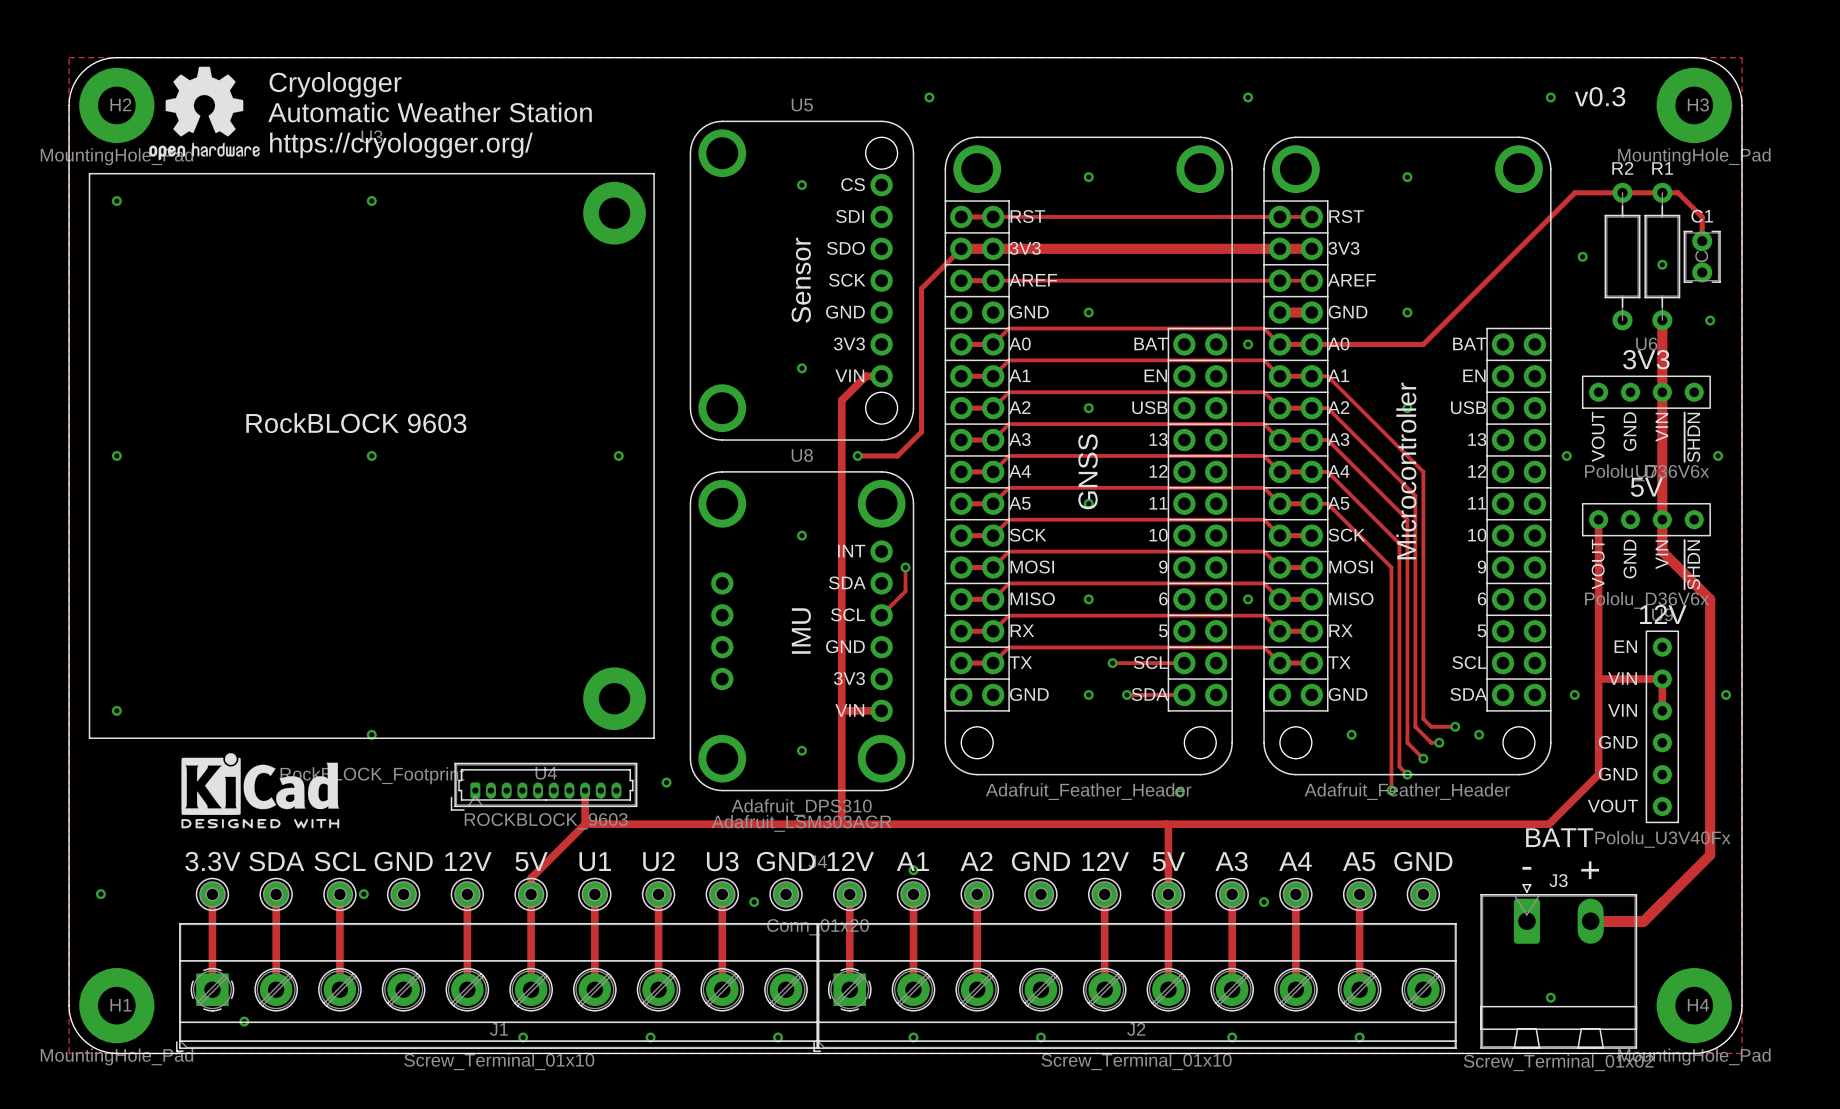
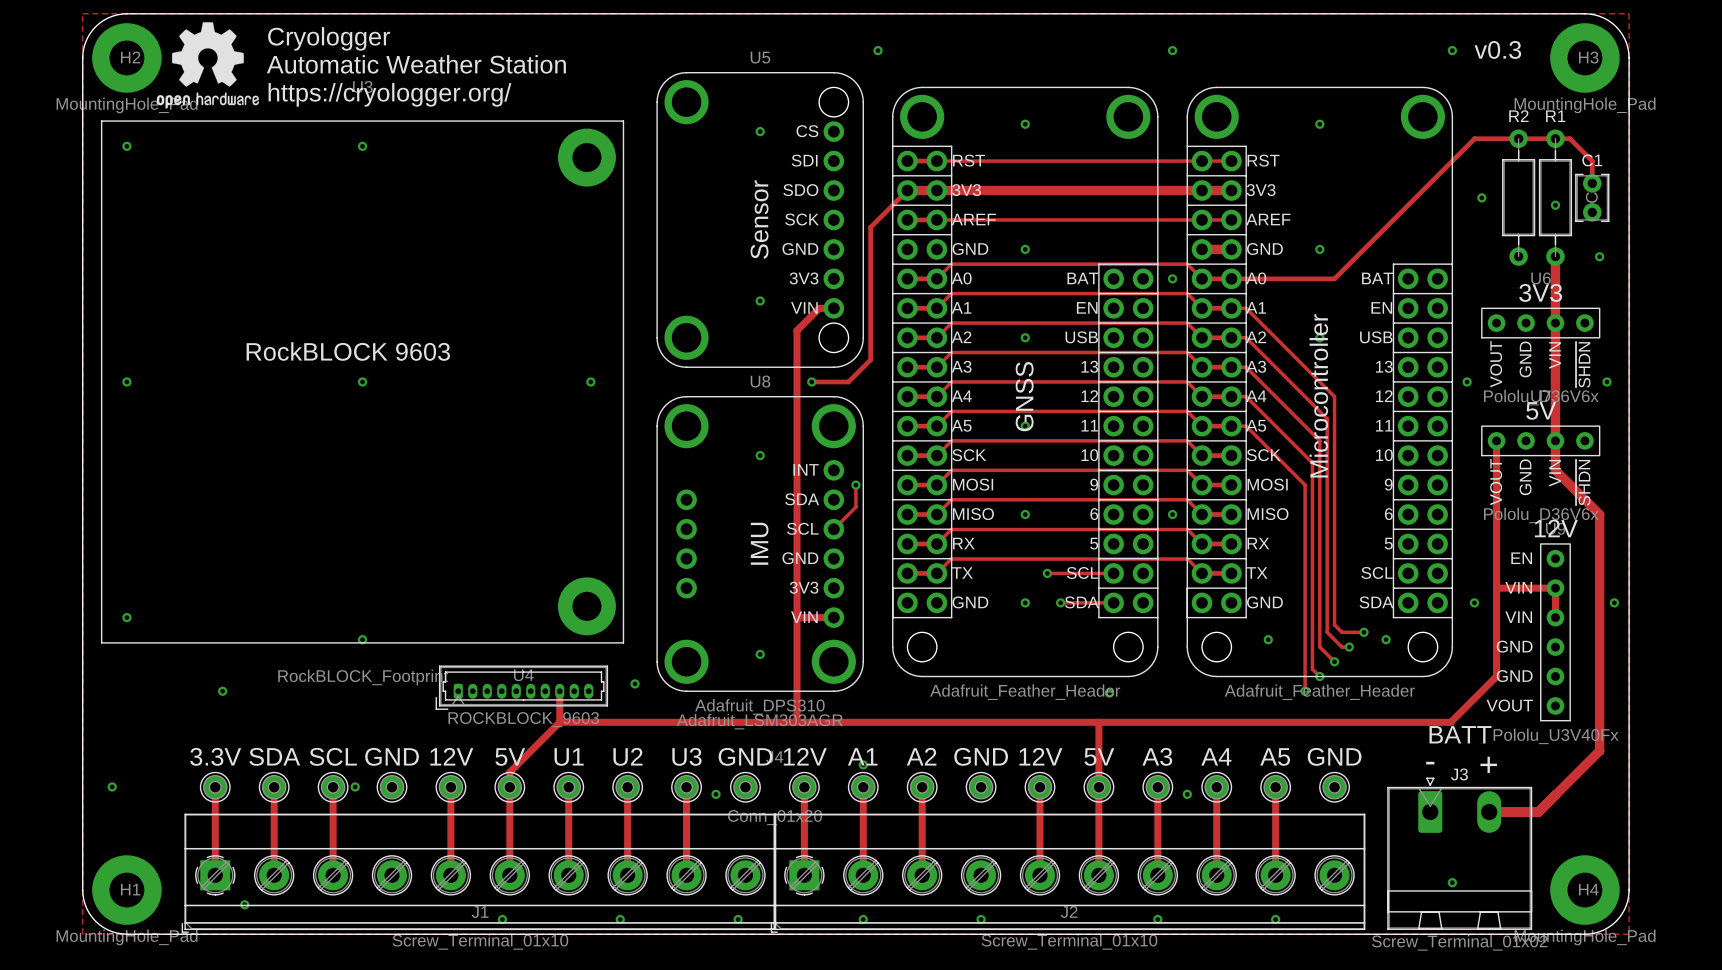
drawing: [181, 753, 340, 829] -> none

